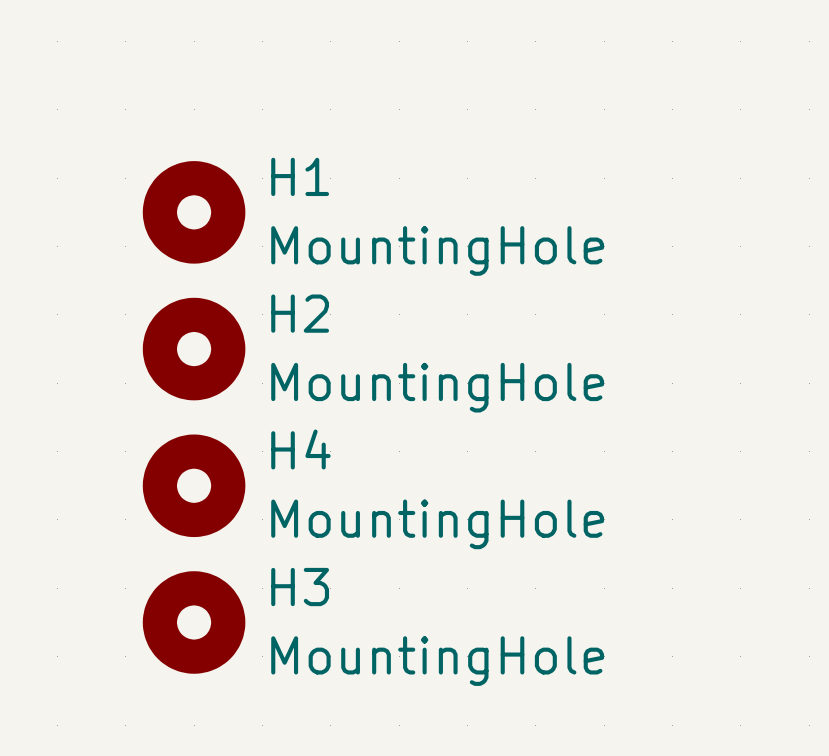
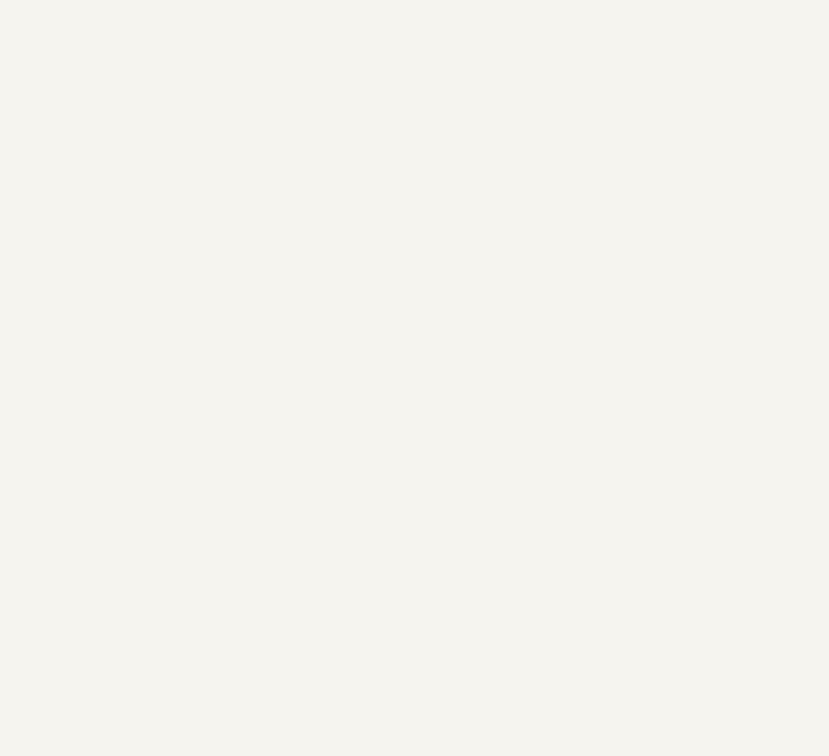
H1: MountingHole (194, 212) -> none
H2: MountingHole (194, 349) -> none
H4: MountingHole (194, 485) -> none
H3: MountingHole (194, 622) -> none

